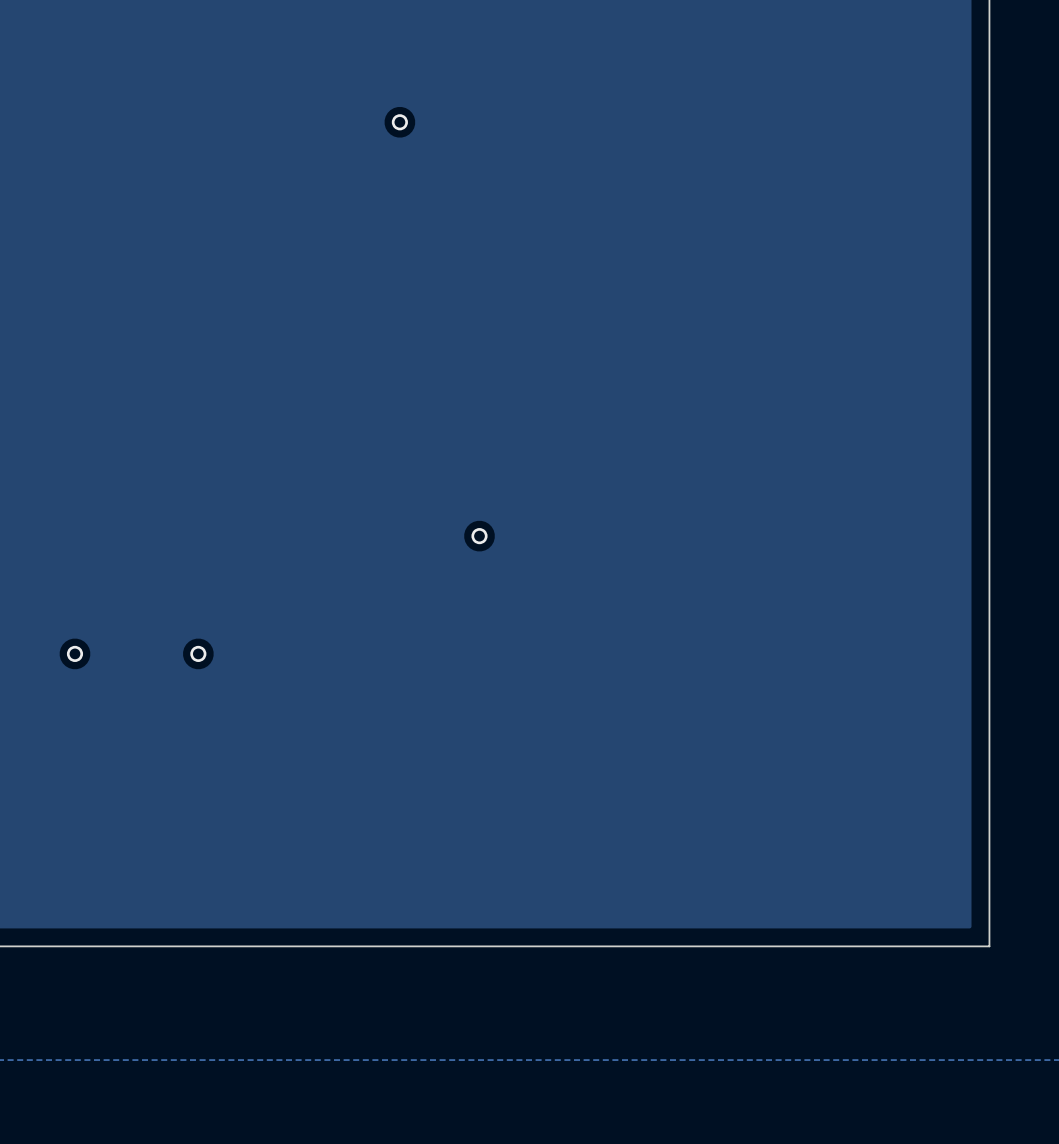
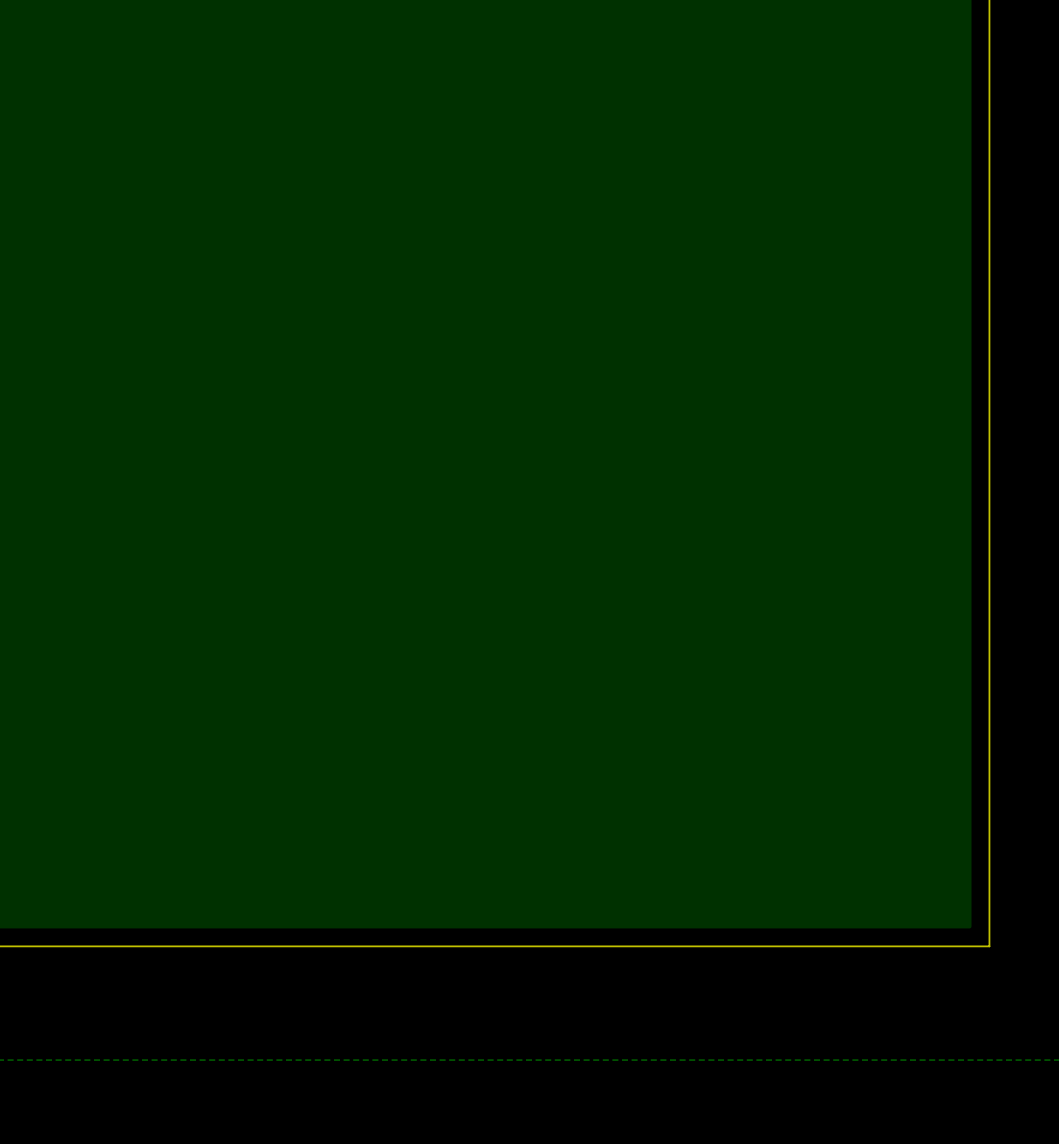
via: (399, 122) -> none
via: (479, 536) -> none
via: (74, 653) -> none
via: (198, 653) -> none

